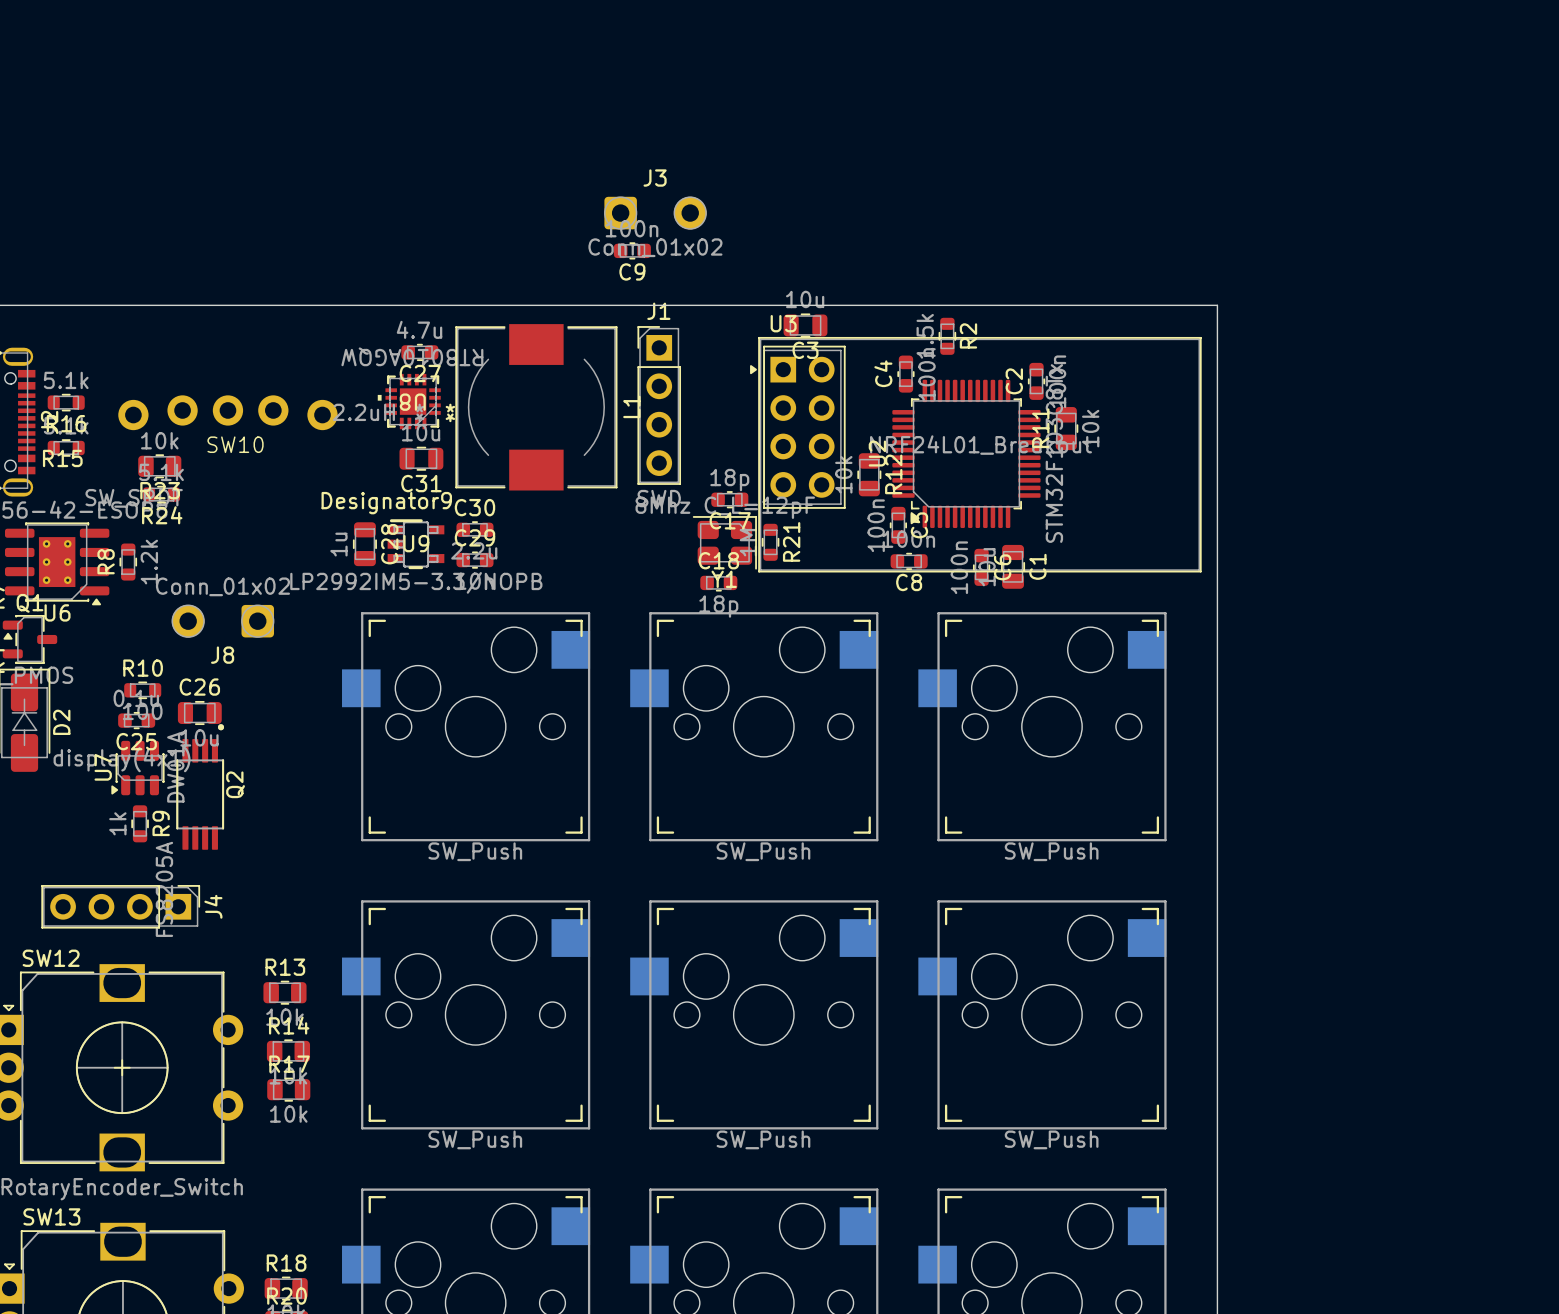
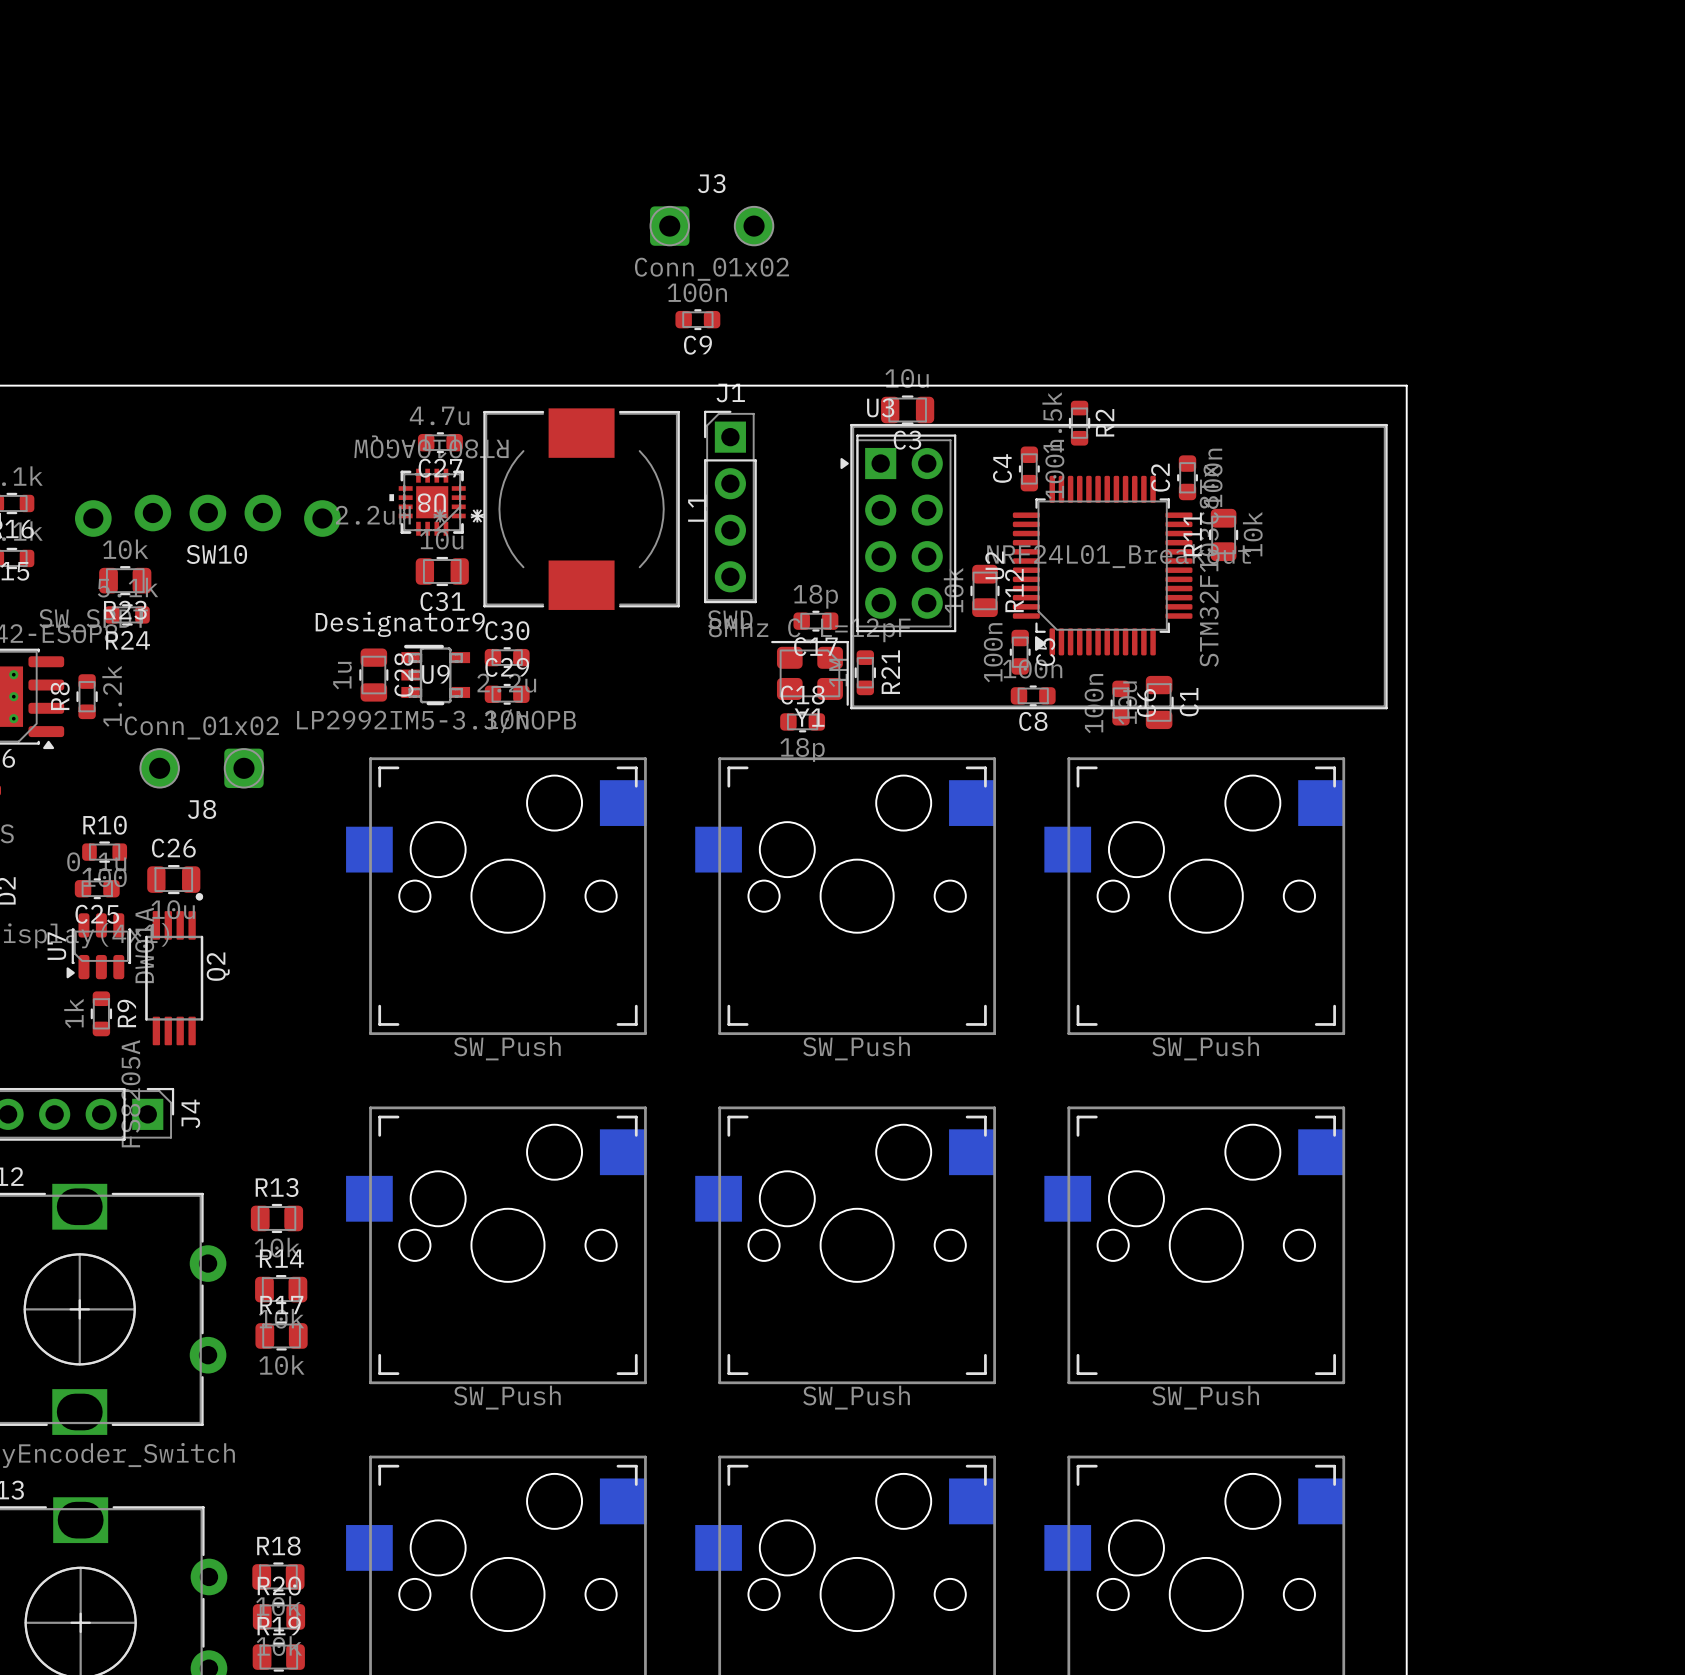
J3 position: (655, 213) -> (711, 226)

